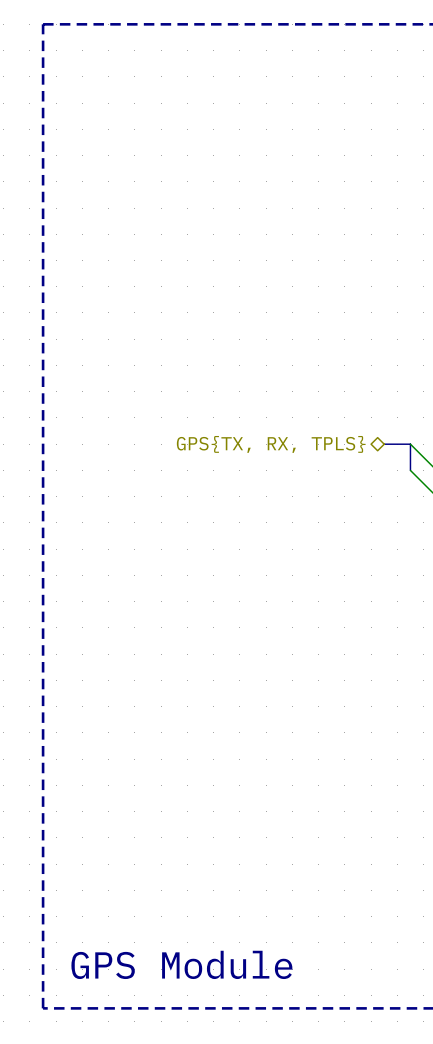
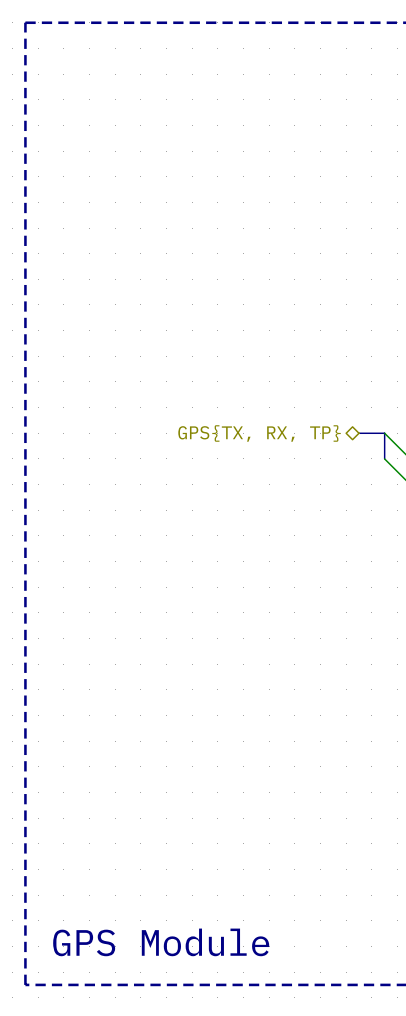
hierarchical label: GPS{TX, RX, TPLS} (271, 444) -> GPS{TX, RX, TP} (259, 433)

